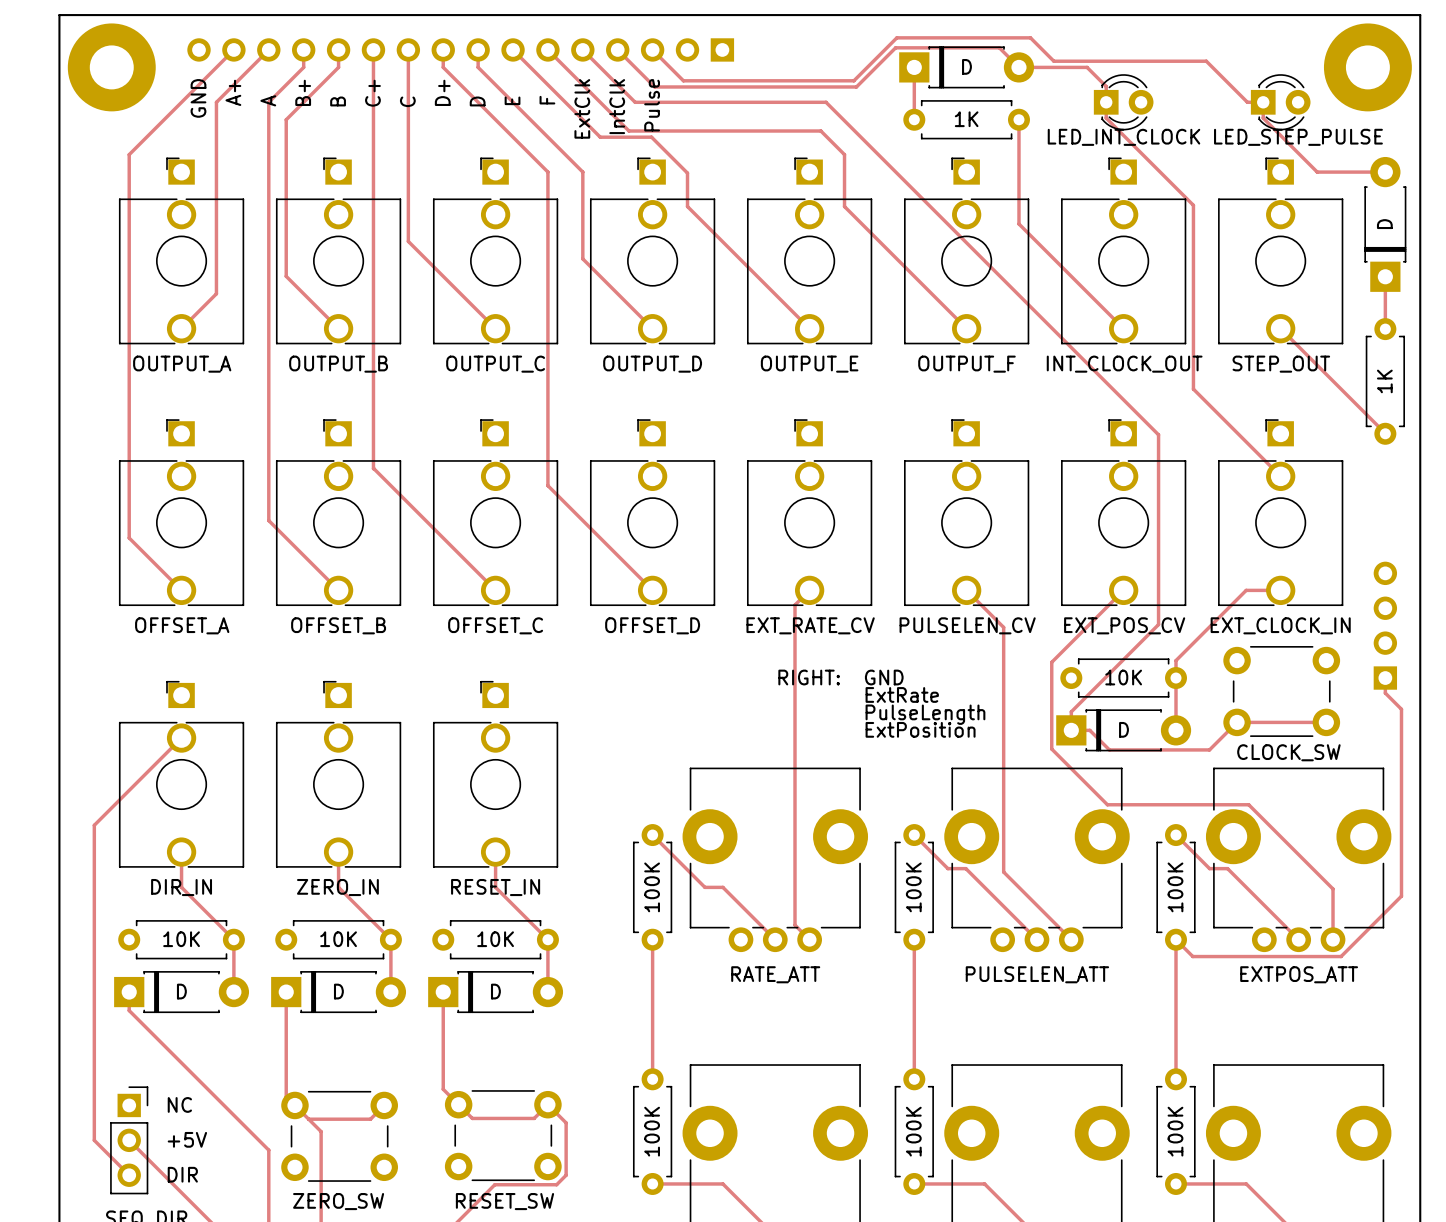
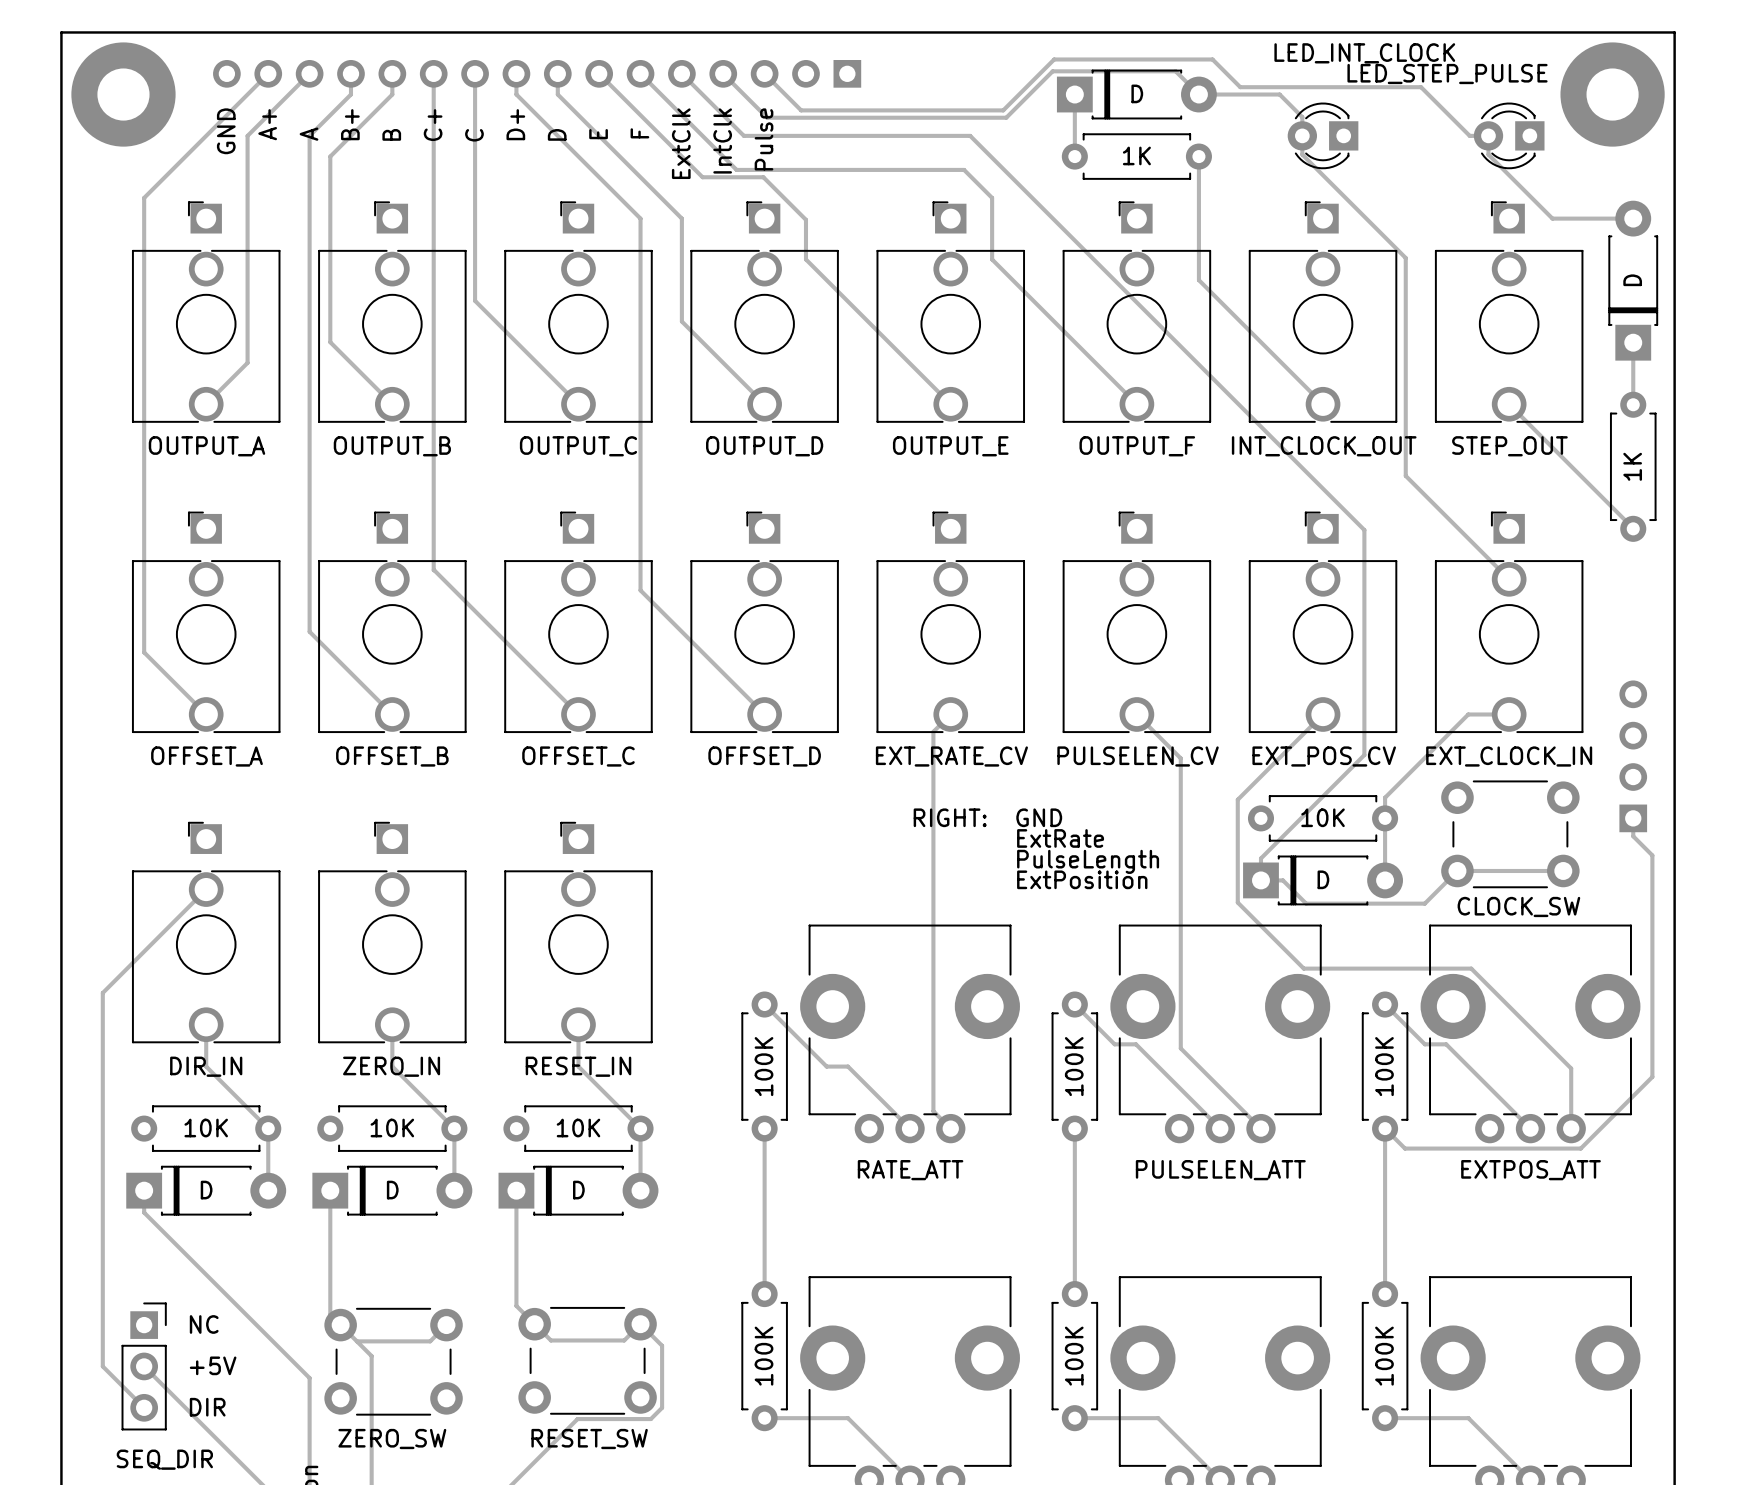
part rotation: 0° (1123, 102) -> 180° (1323, 135)
part rotation: 0° (1280, 102) -> 180° (1509, 135)
part value position: LED_INT_CLOCK (1123, 137) -> LED_INT_CLOCK (1364, 53)
part value position: LED_STEP_PULSE (1298, 137) -> LED_STEP_PULSE (1447, 74)

